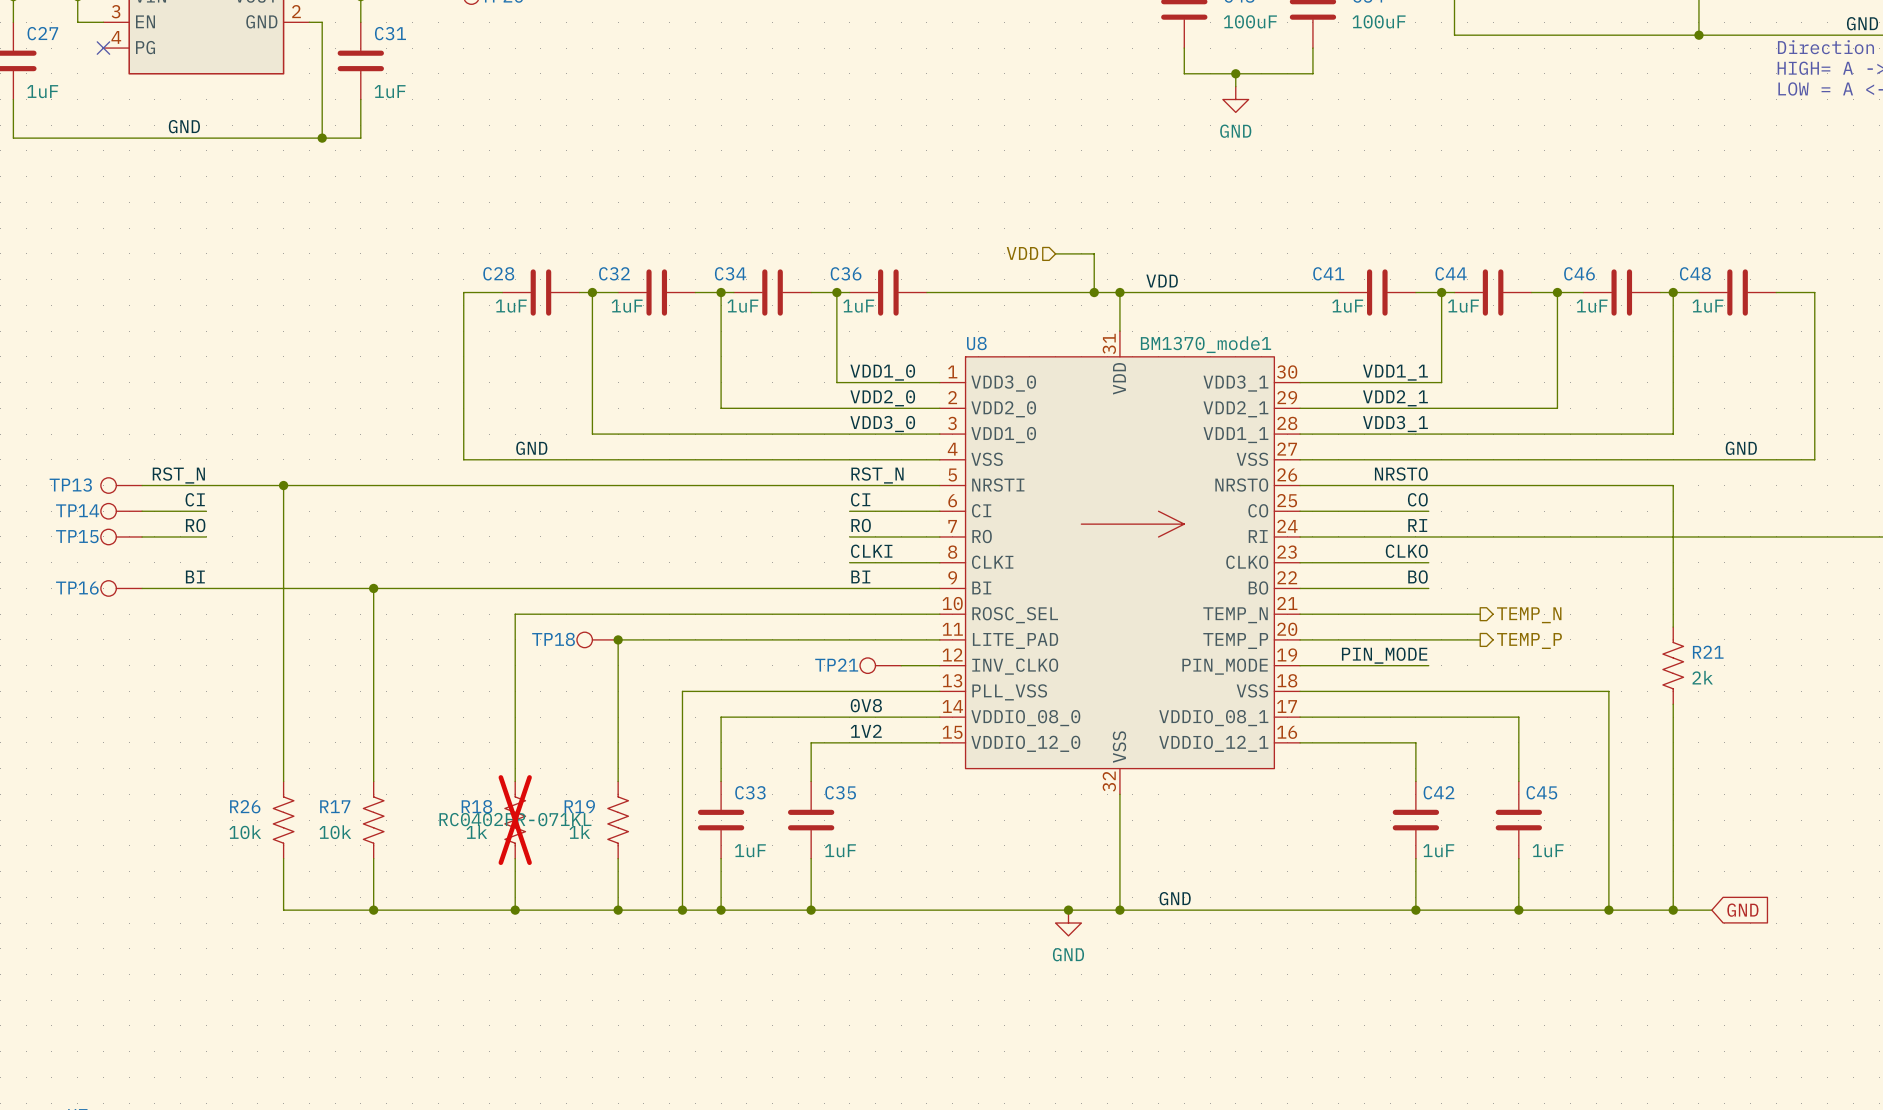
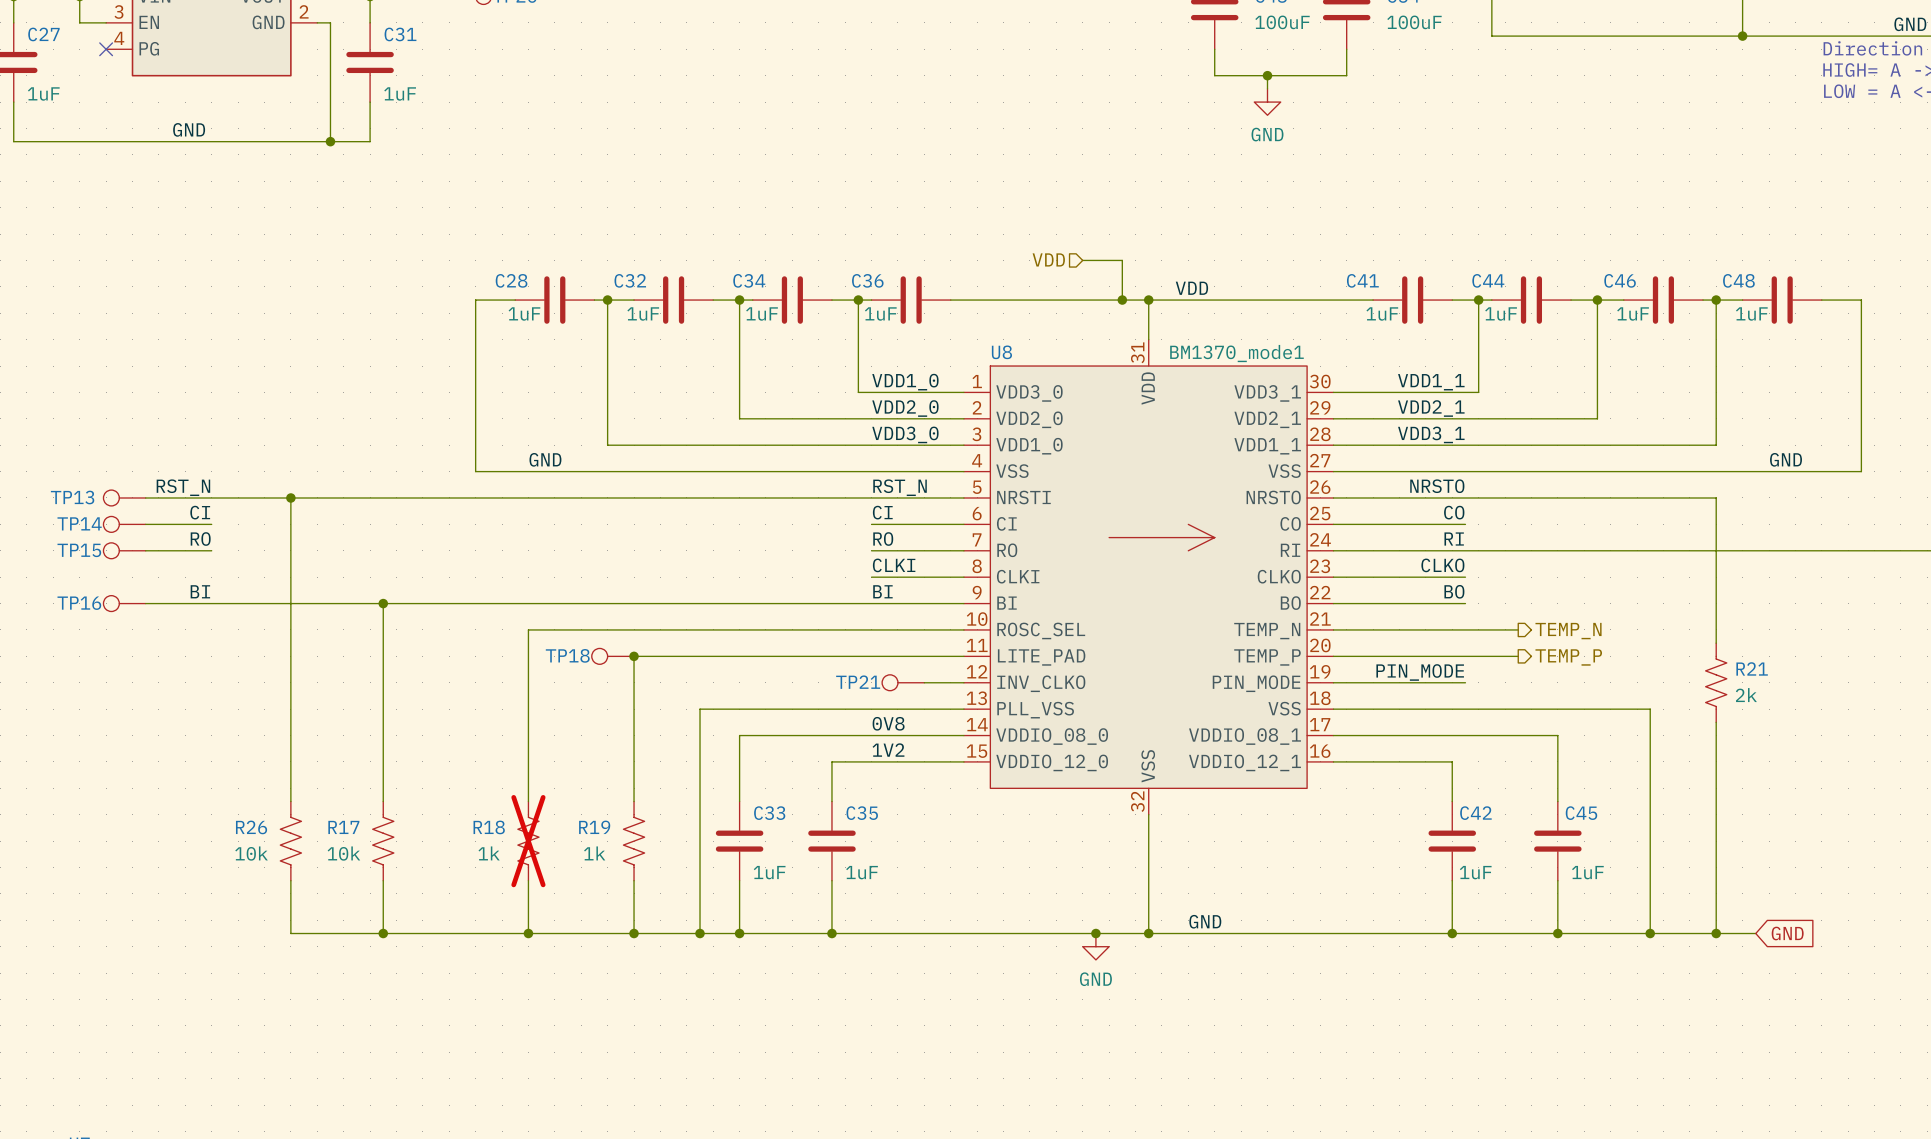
R18 text: RC0402FR-071KL (515, 819) -> none

